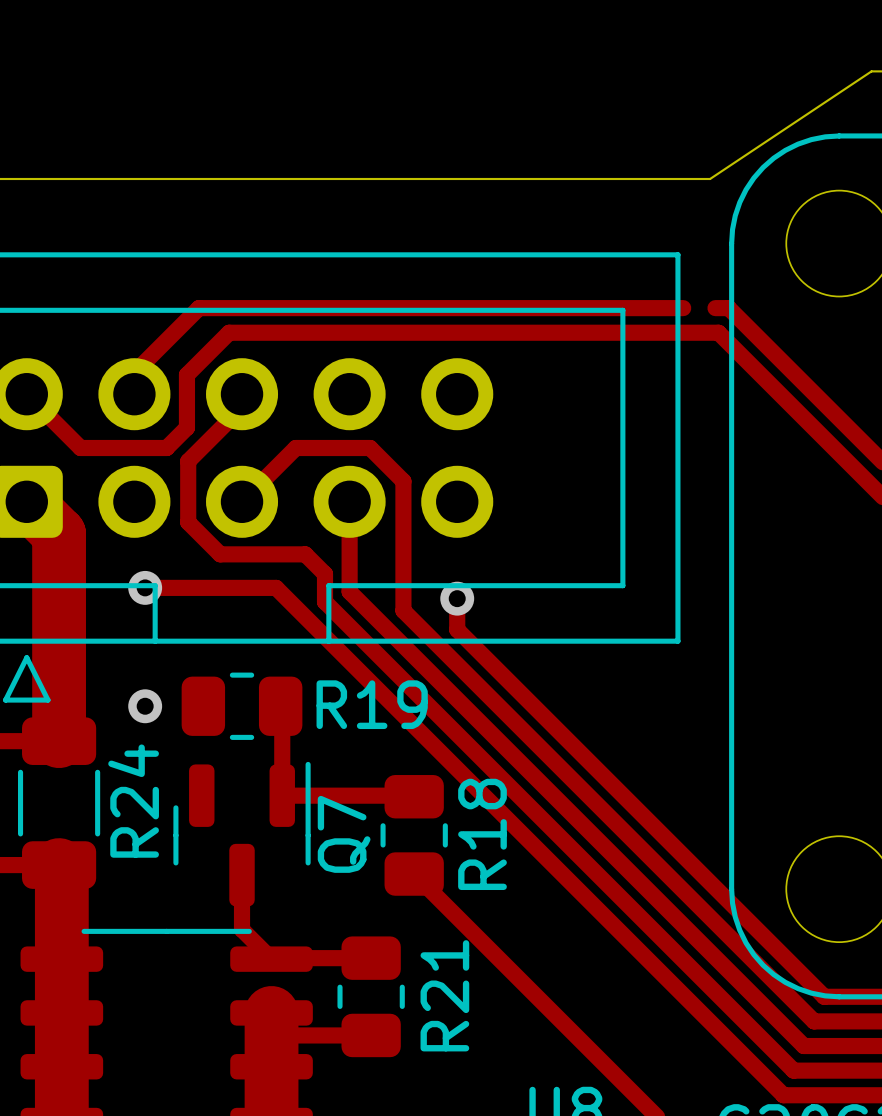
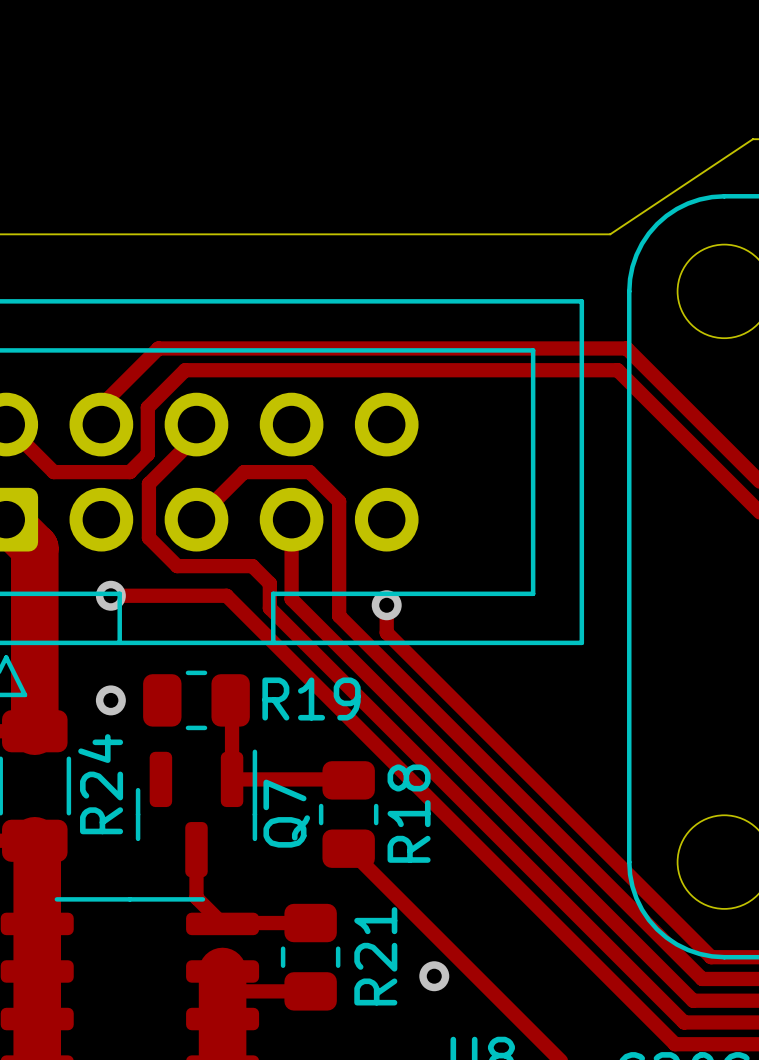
track: none -> (586, 348) (614, 348)
via: none -> (434, 976)

